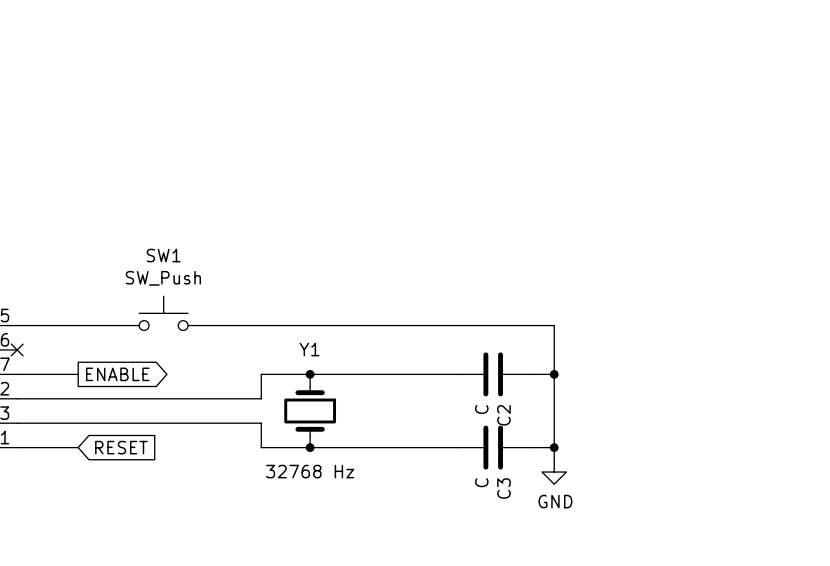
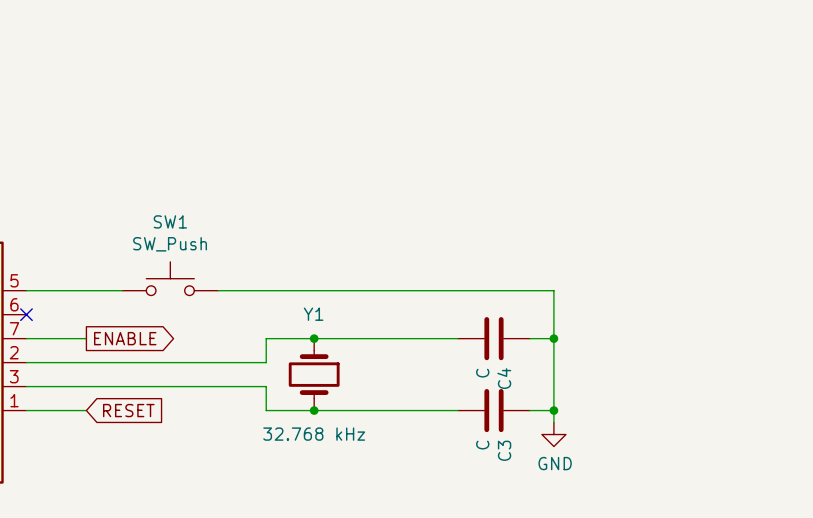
C2 name: C2 (503, 415) -> C4 (504, 378)
Y1 value: 32768 Hz (310, 471) -> 32.768 kHz (314, 434)

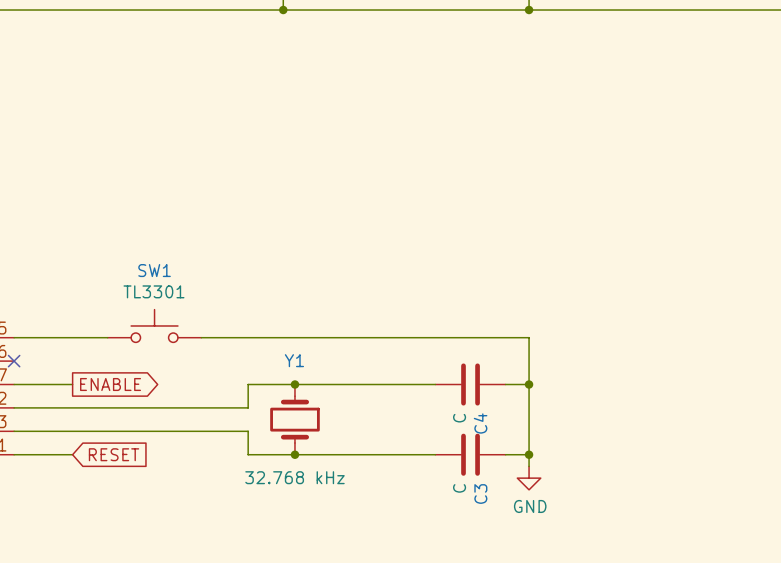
SW1 value: SW_Push (170, 244) -> TL3301 (153, 291)

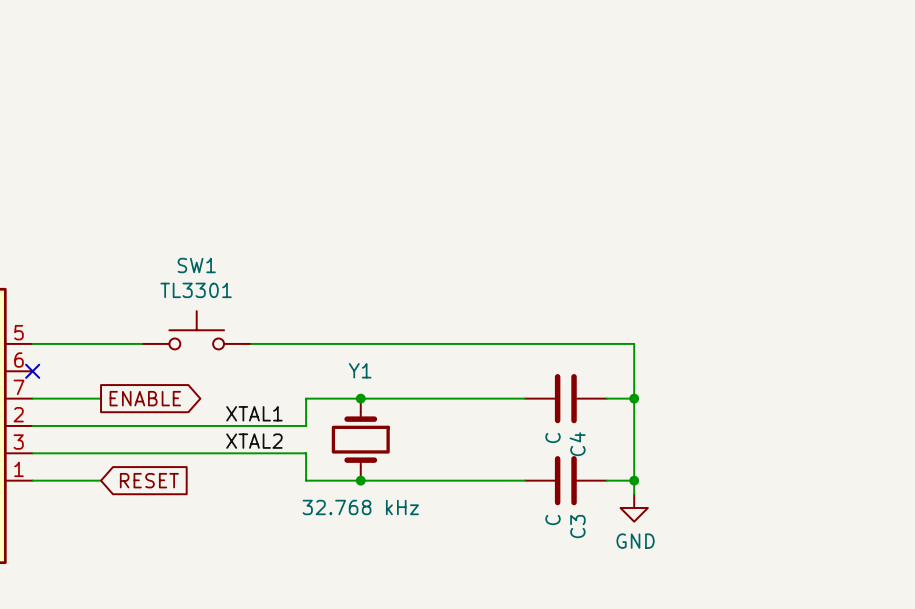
label: none -> XTAL1 (254, 413)
label: none -> XTAL2 (254, 441)

